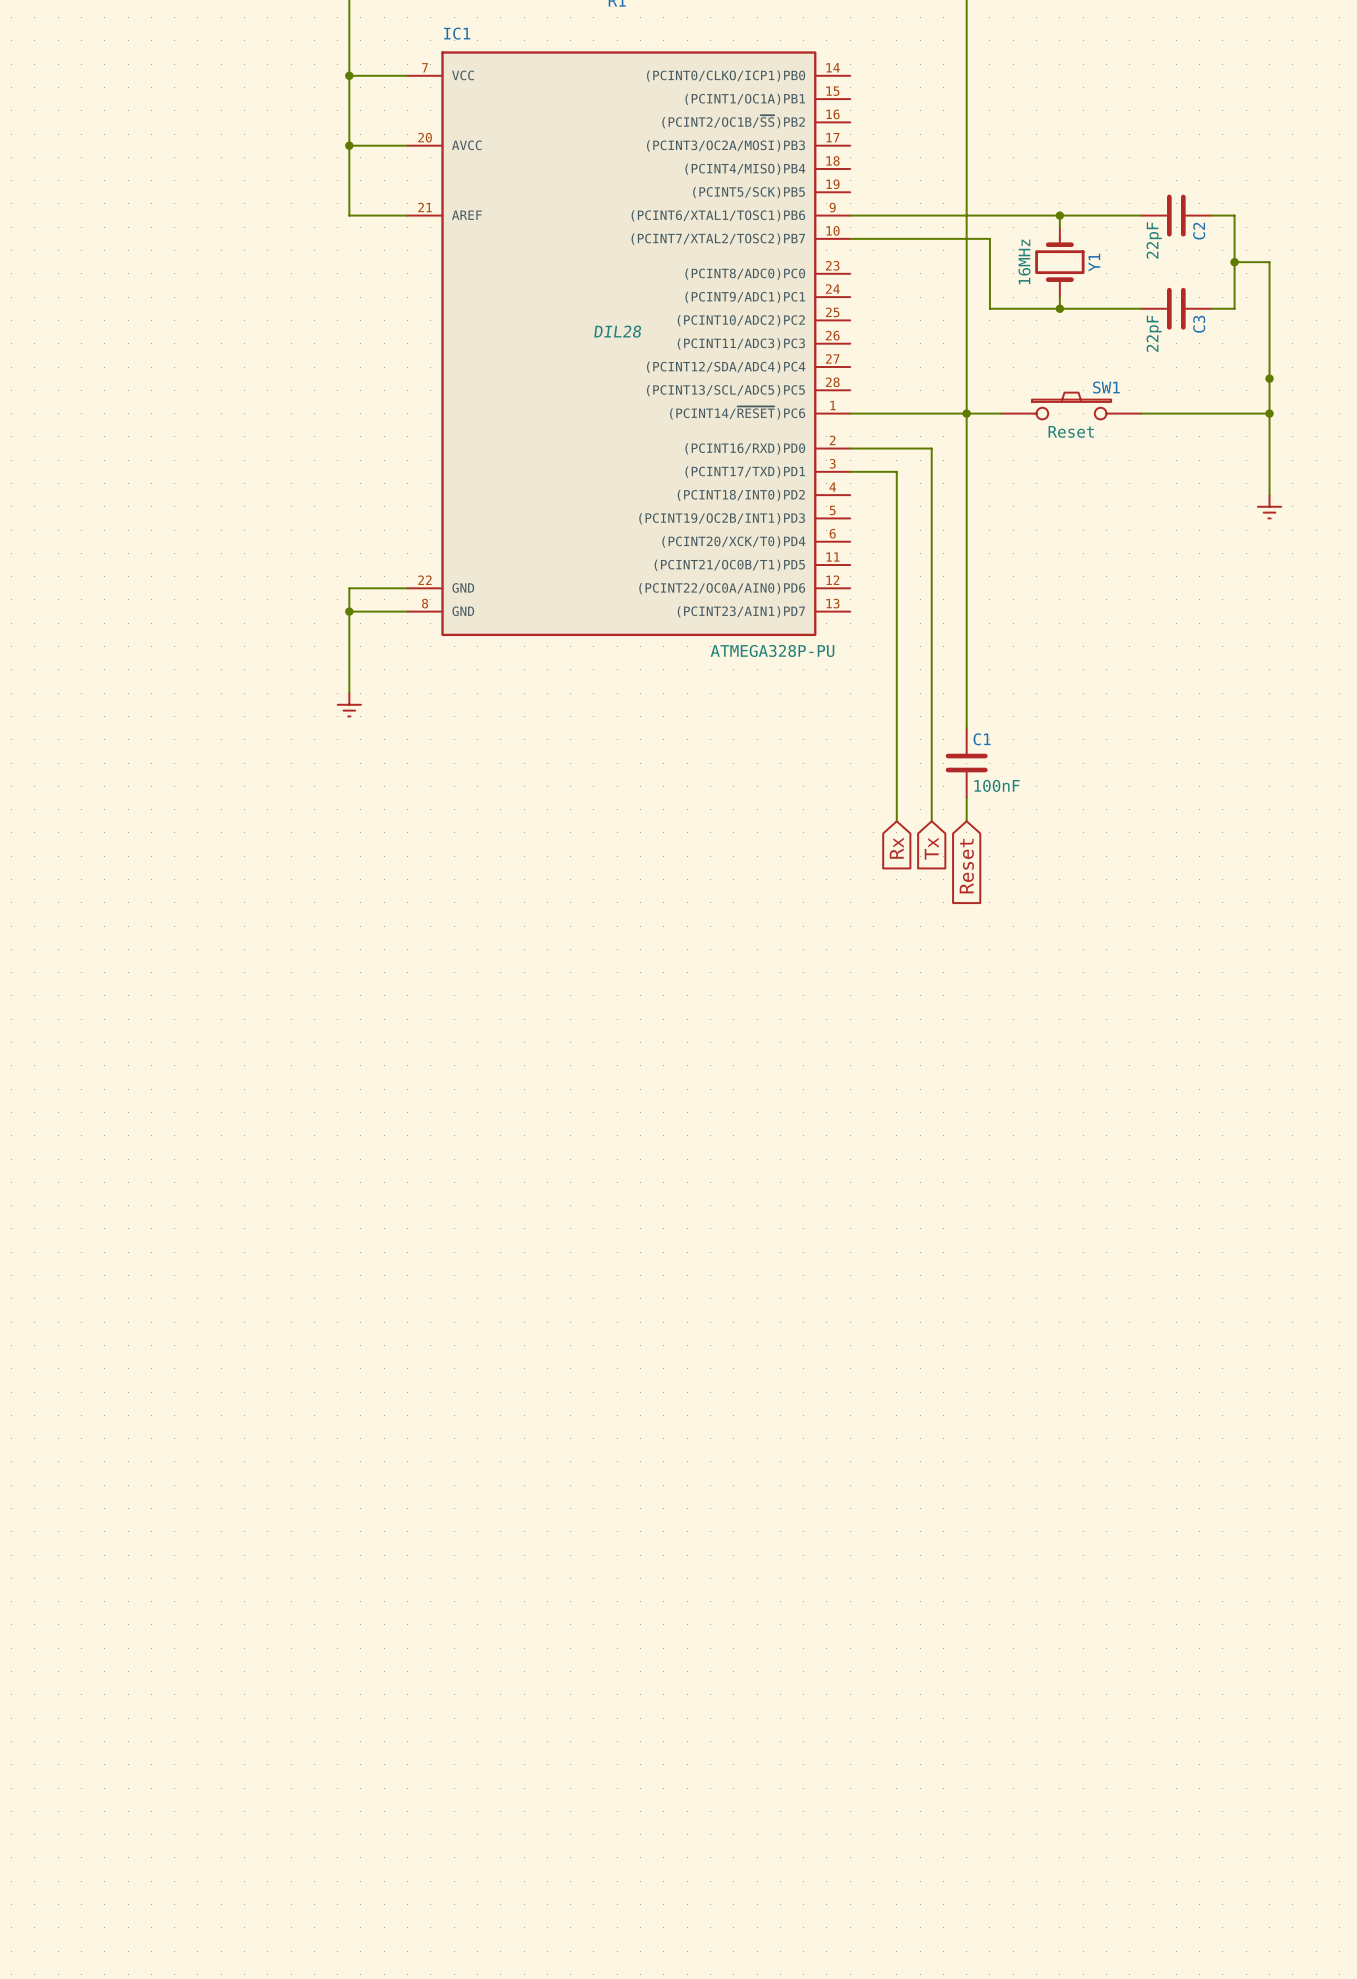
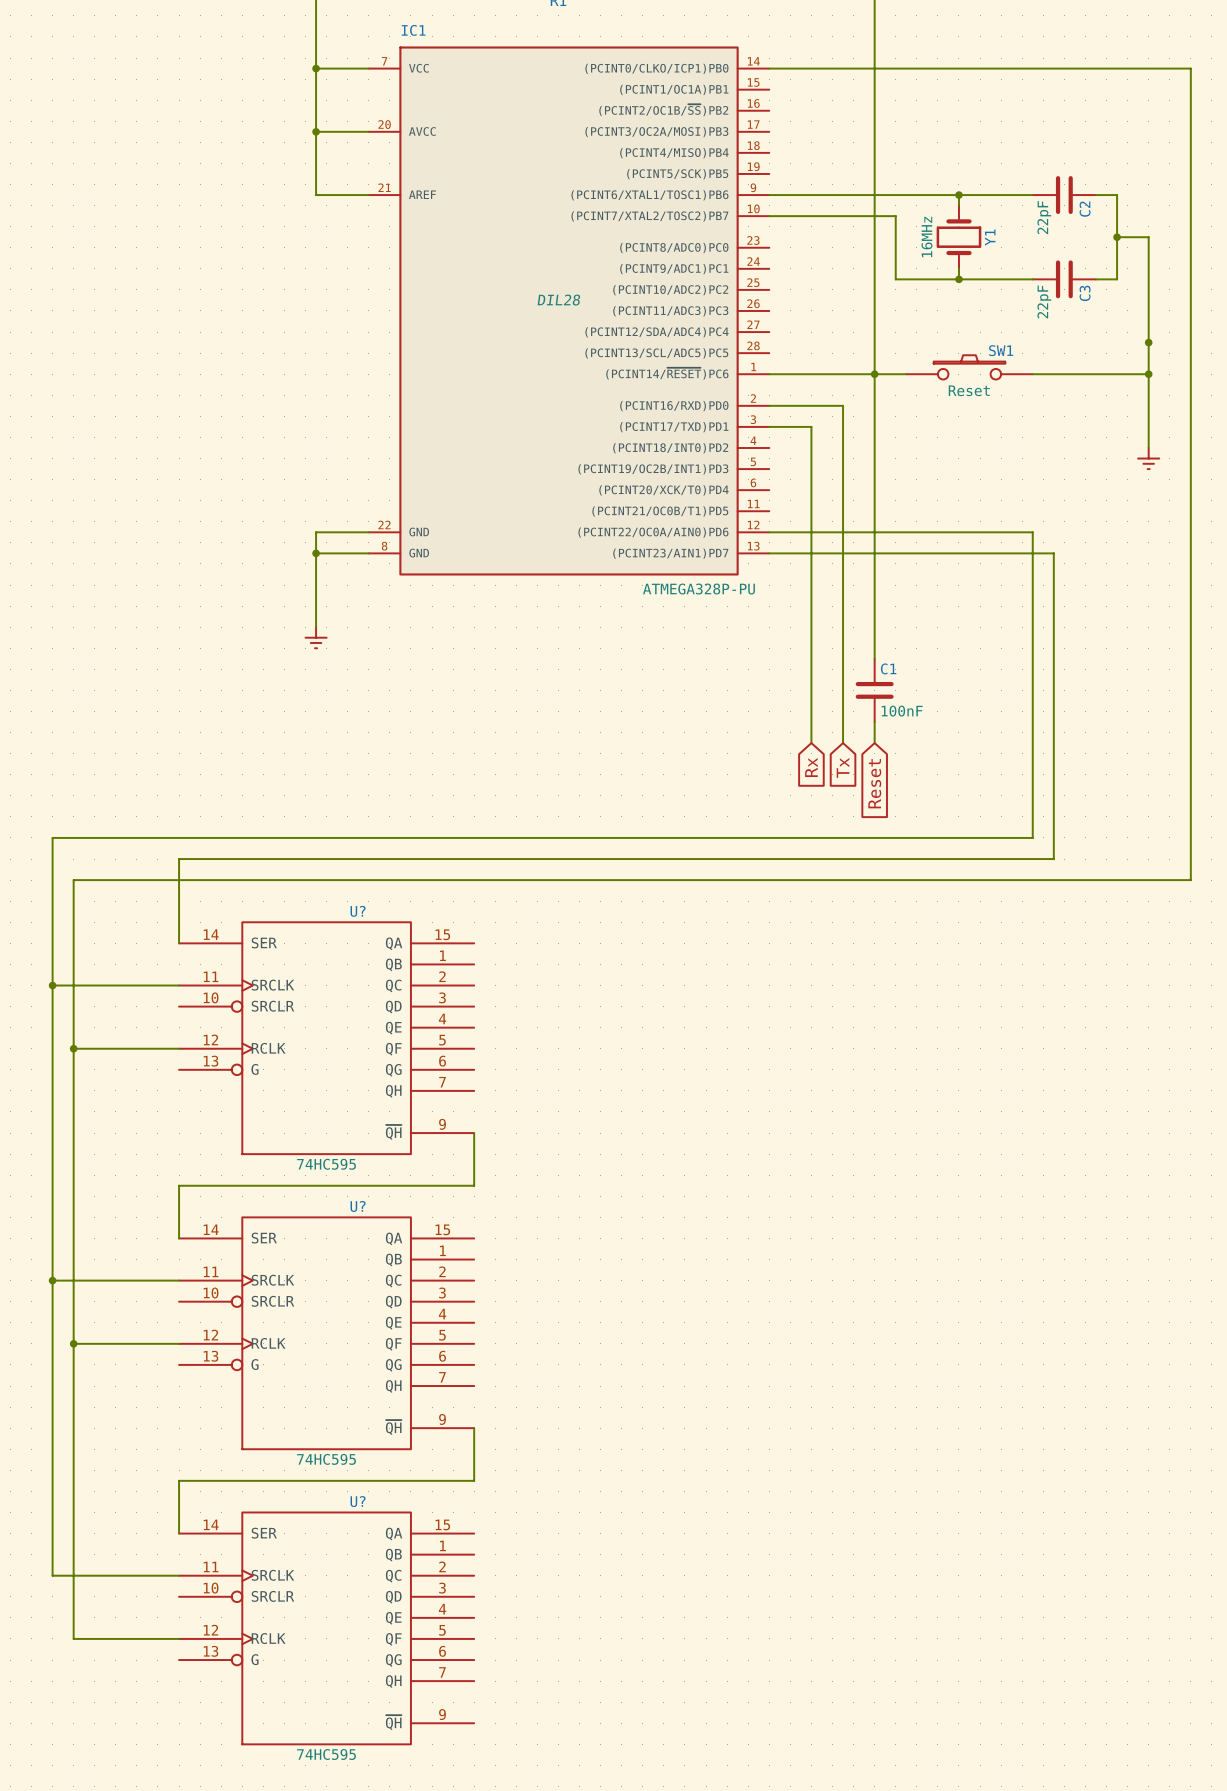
wire: none -> (769, 68) (1190, 68) (1190, 880) (73, 880) (73, 1638) (179, 1638)
wire: none -> (769, 532) (1032, 532) (1032, 837) (52, 837) (52, 1575) (179, 1575)
wire: none -> (769, 553) (1053, 553) (1053, 859) (179, 859) (179, 943)
wire: none -> (52, 985) (179, 985)
junction: none -> (52, 985)
U?: none -> 74HC595 (326, 1038)
wire: none -> (73, 1048) (179, 1048)
junction: none -> (73, 1048)
wire: none -> (474, 1133) (474, 1185) (179, 1185) (179, 1238)
wire: none -> (52, 1280) (179, 1280)
junction: none -> (52, 1280)
U?: none -> 74HC595 (326, 1333)
wire: none -> (73, 1343) (179, 1343)
junction: none -> (73, 1343)
wire: none -> (474, 1428) (474, 1480) (179, 1480) (179, 1533)
U?: none -> 74HC595 (326, 1628)

